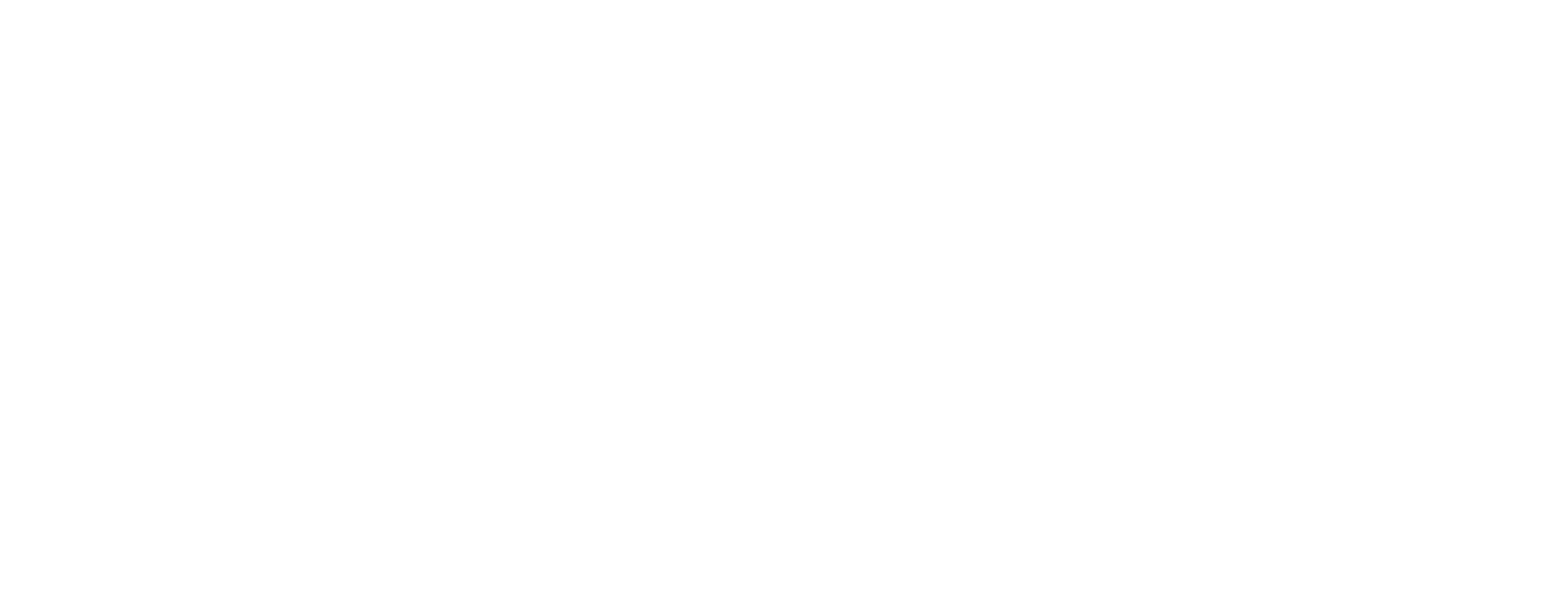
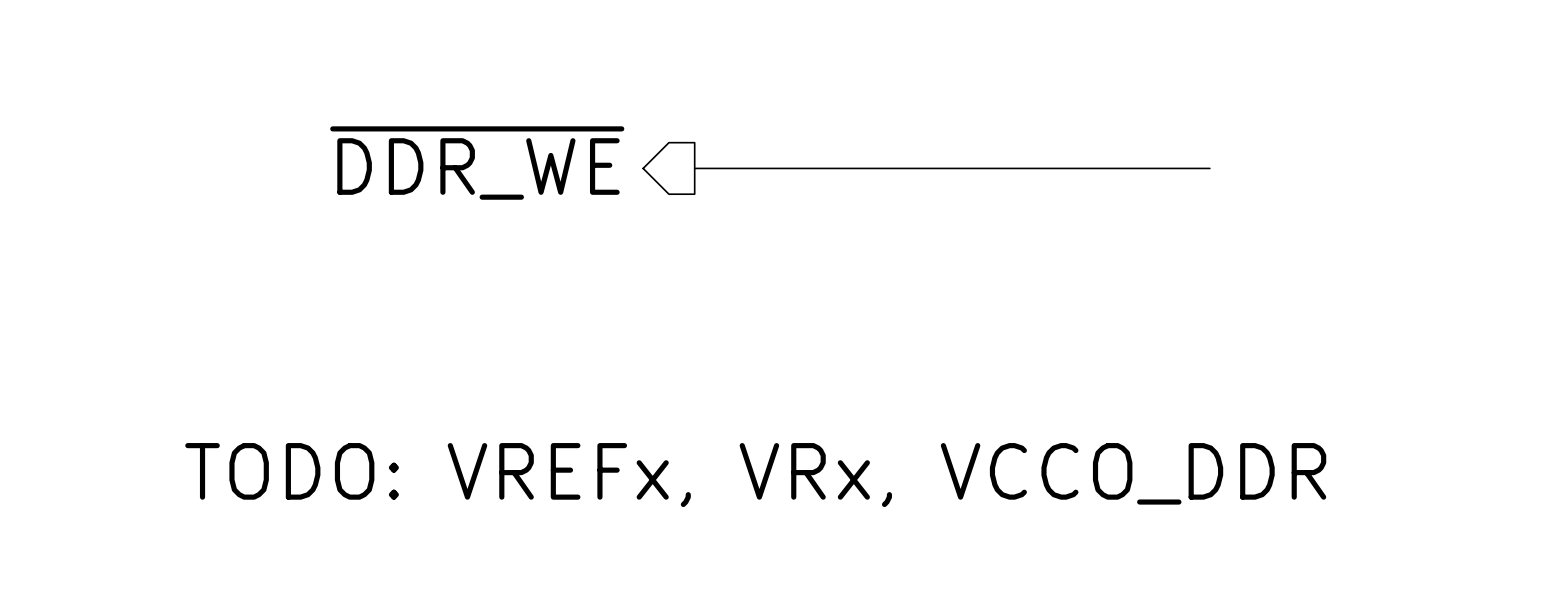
hierarchical label: none -> ~{DDR_WE} (477, 163)
wire: none -> (694, 168) (1209, 168)
text: none -> TODO: VREFx, VRx, VCCO_DDR (755, 475)

